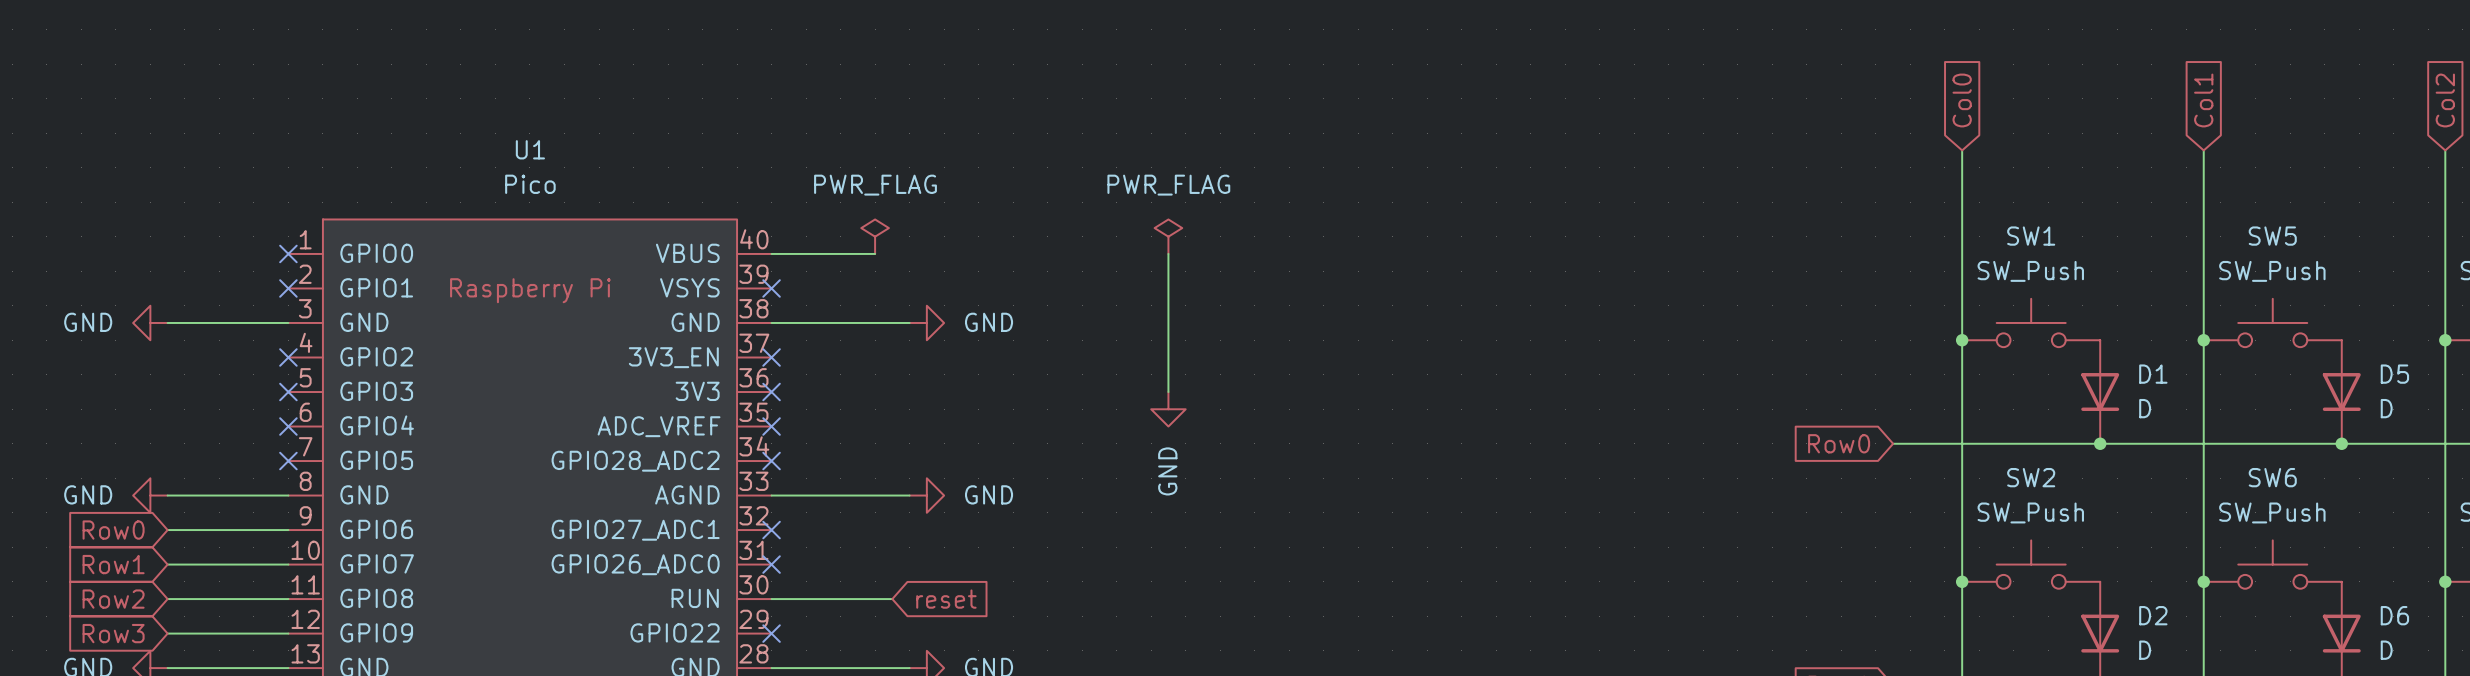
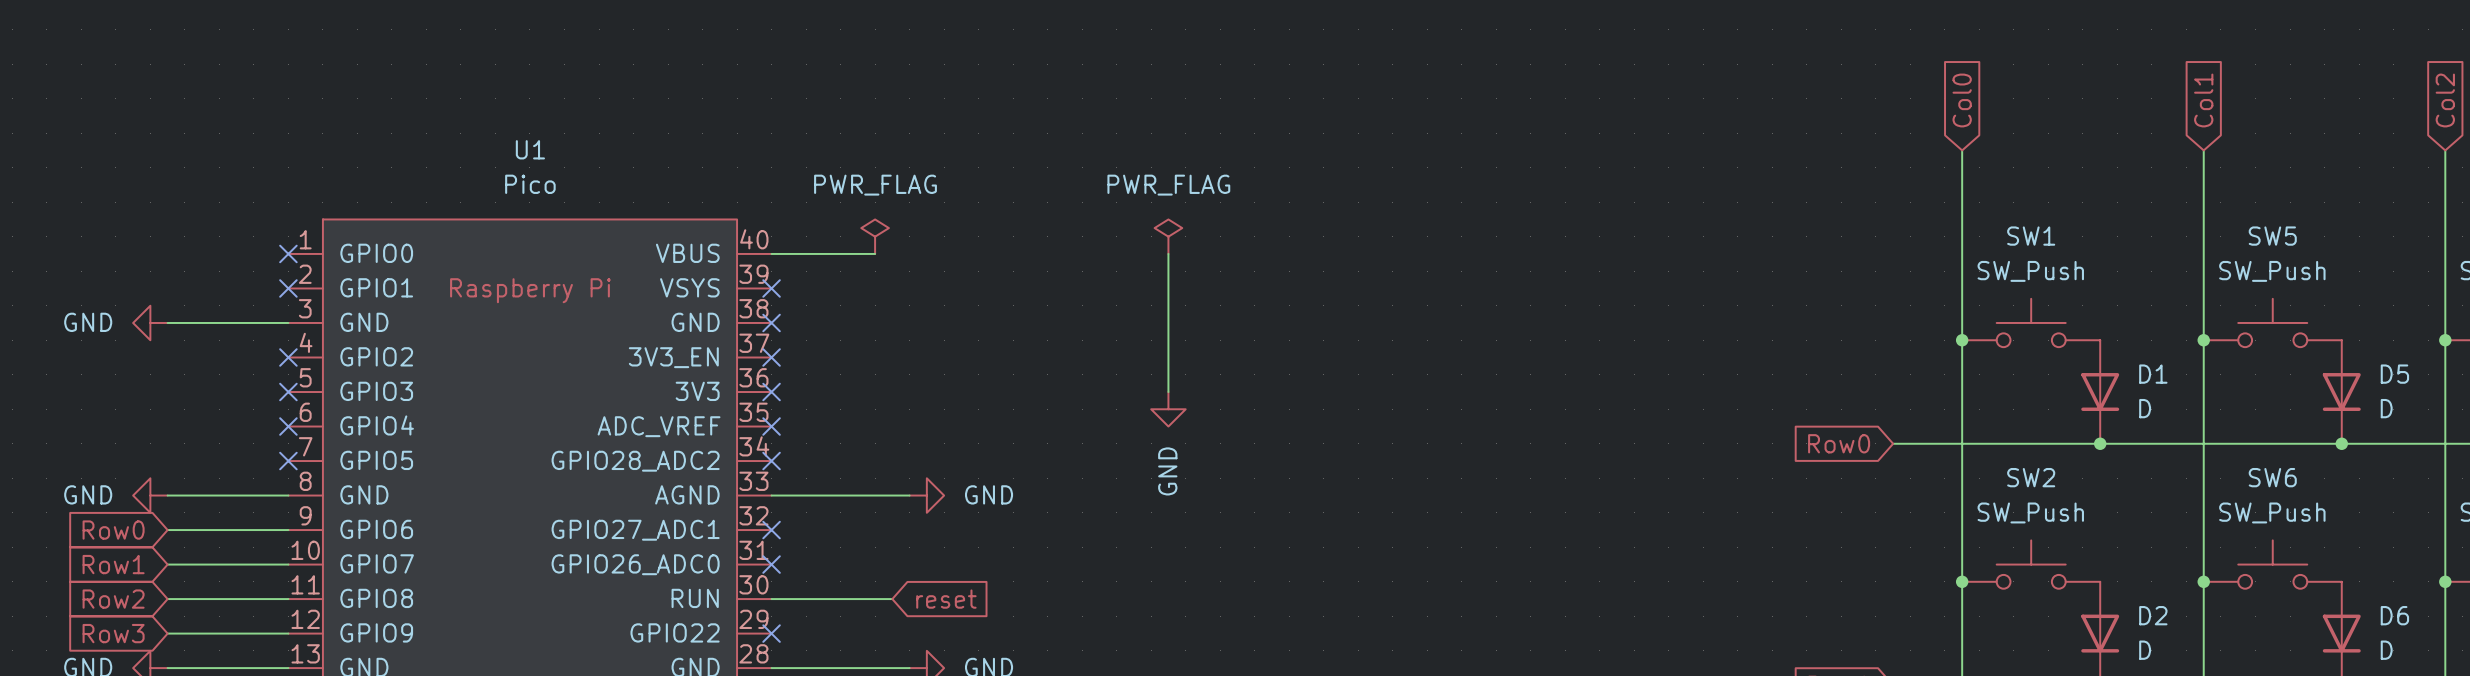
wire: (771, 322) (909, 322) -> none
no-connect mark: none -> (771, 322)
power symbol: GND (926, 322) -> none

